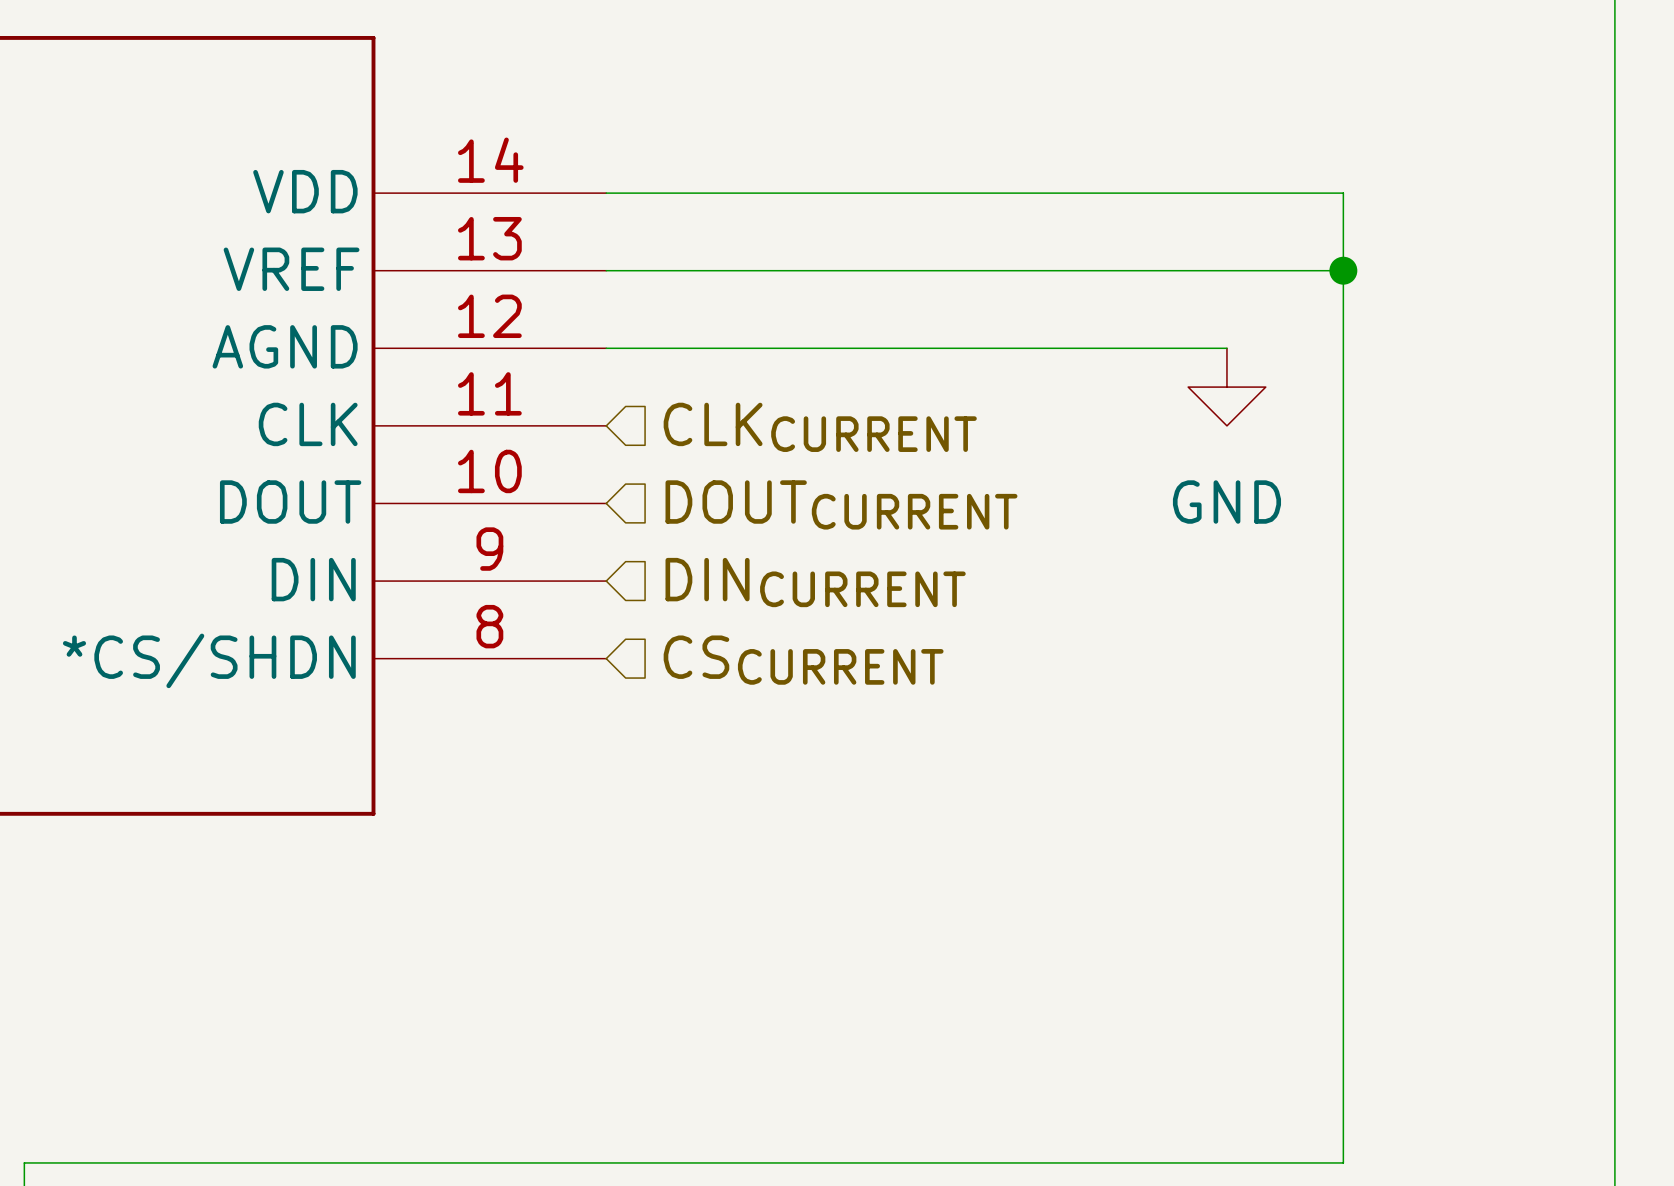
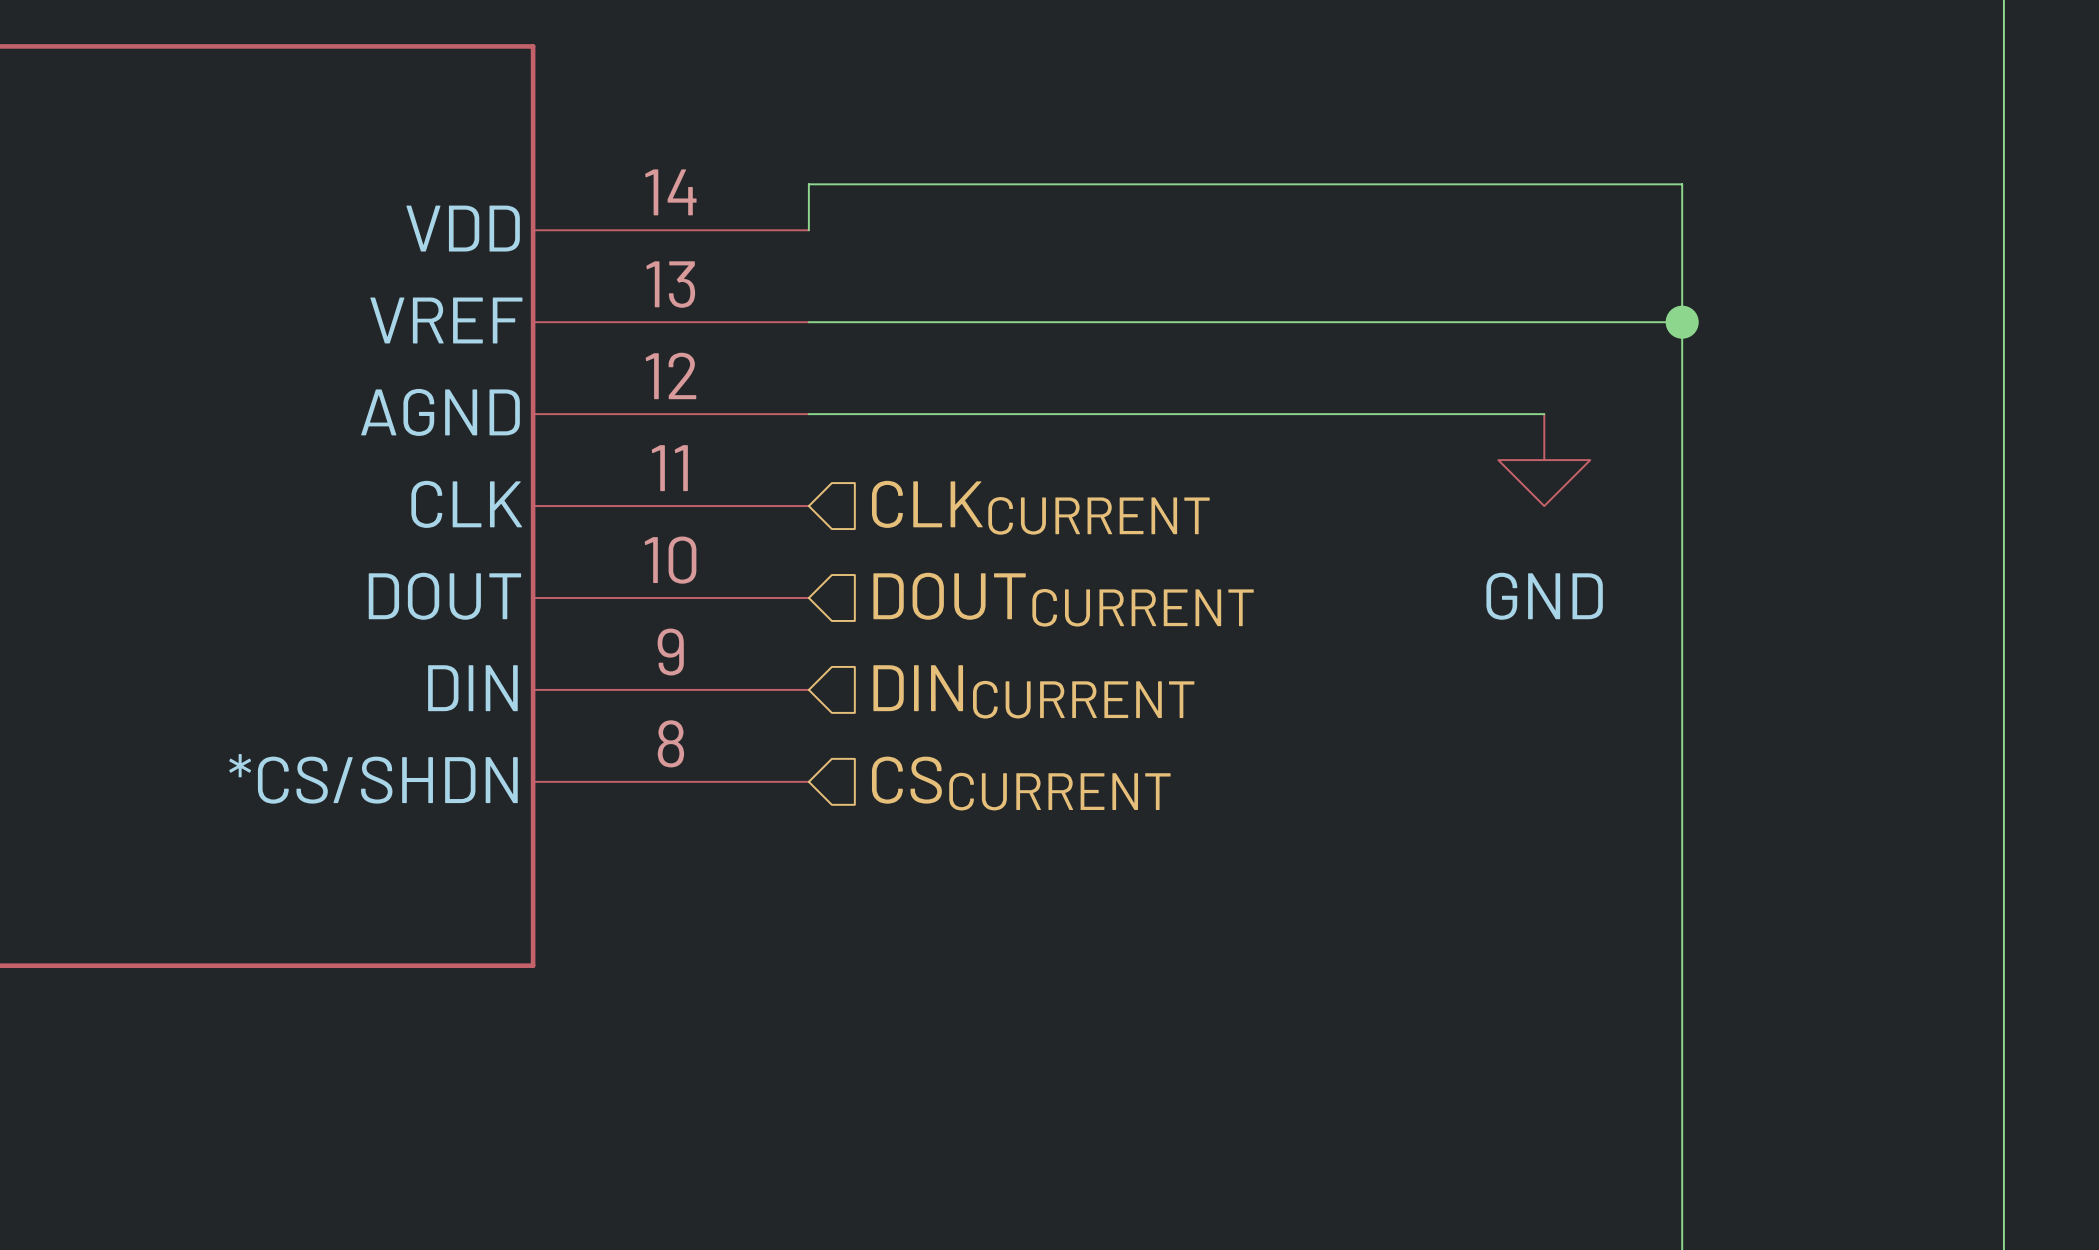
wire: (606, 193) (1343, 193) -> (808, 230) (808, 184) (1682, 184) (1682, 230)

